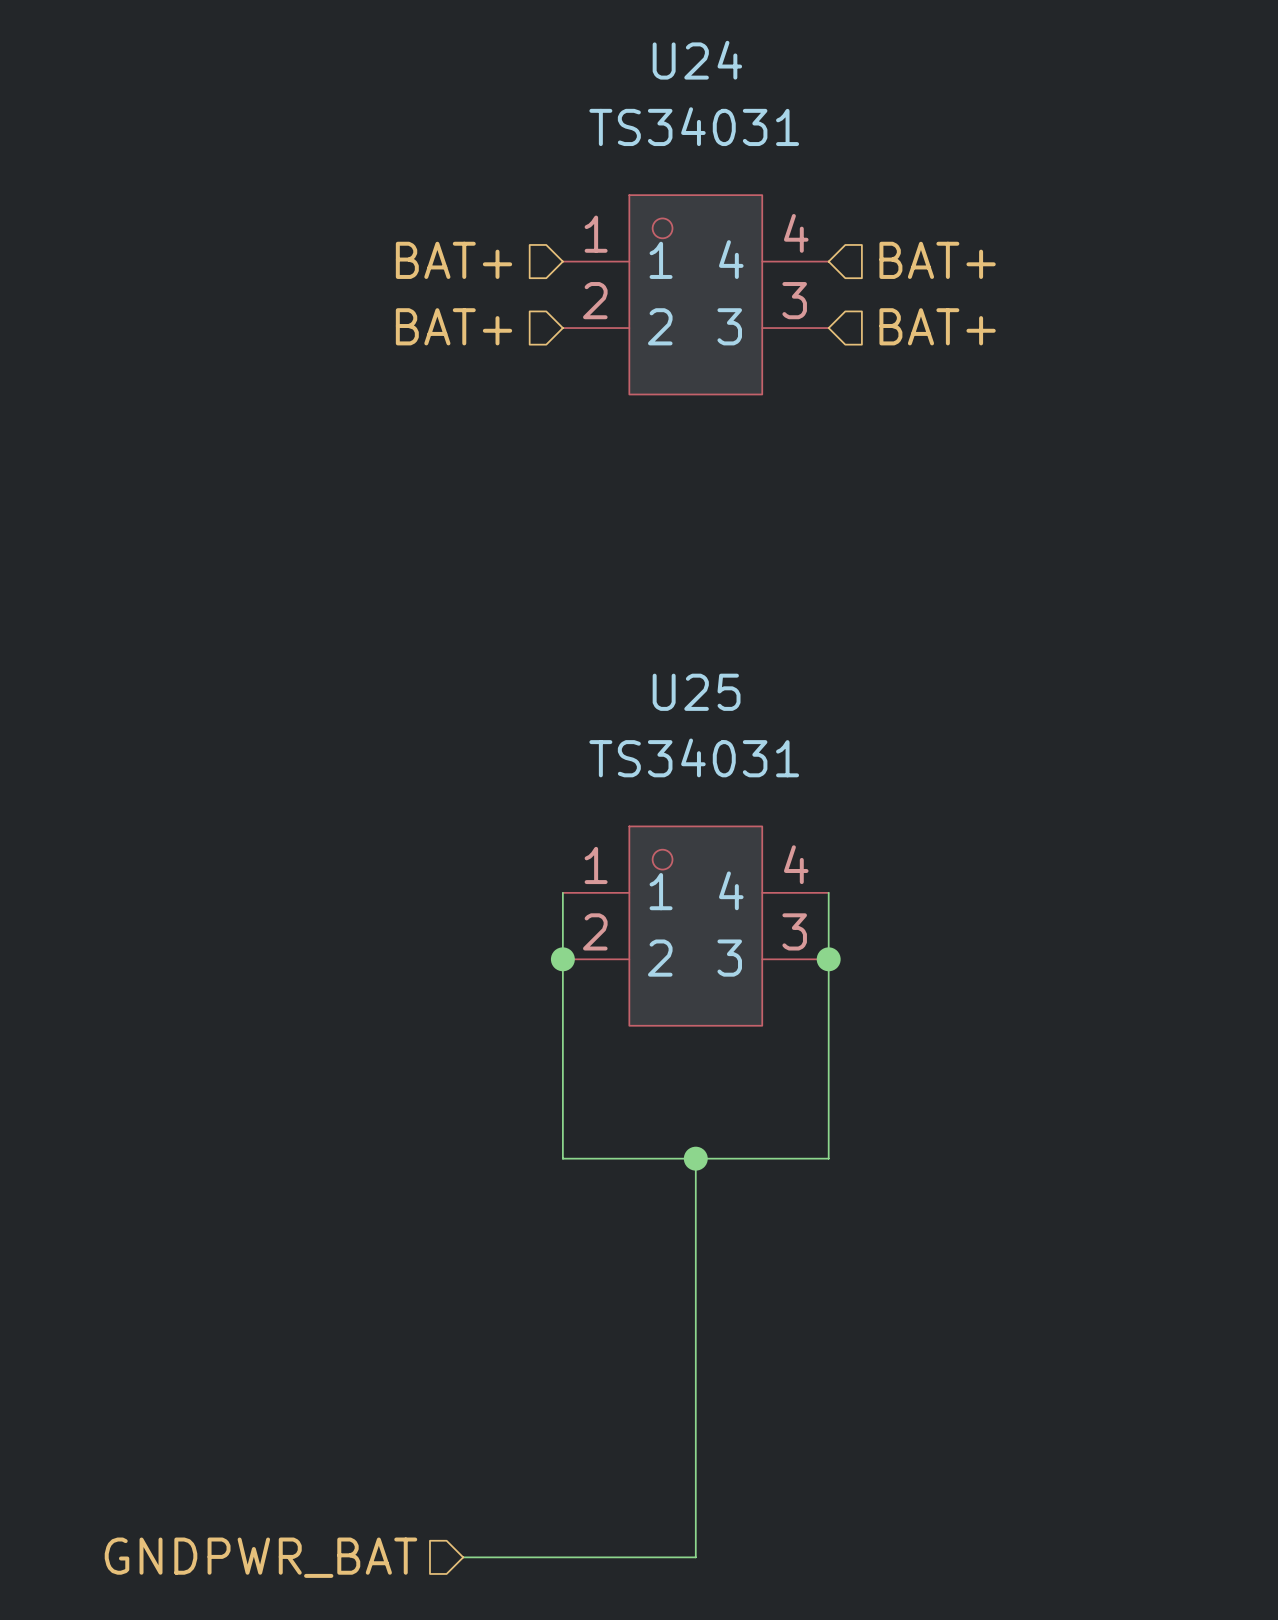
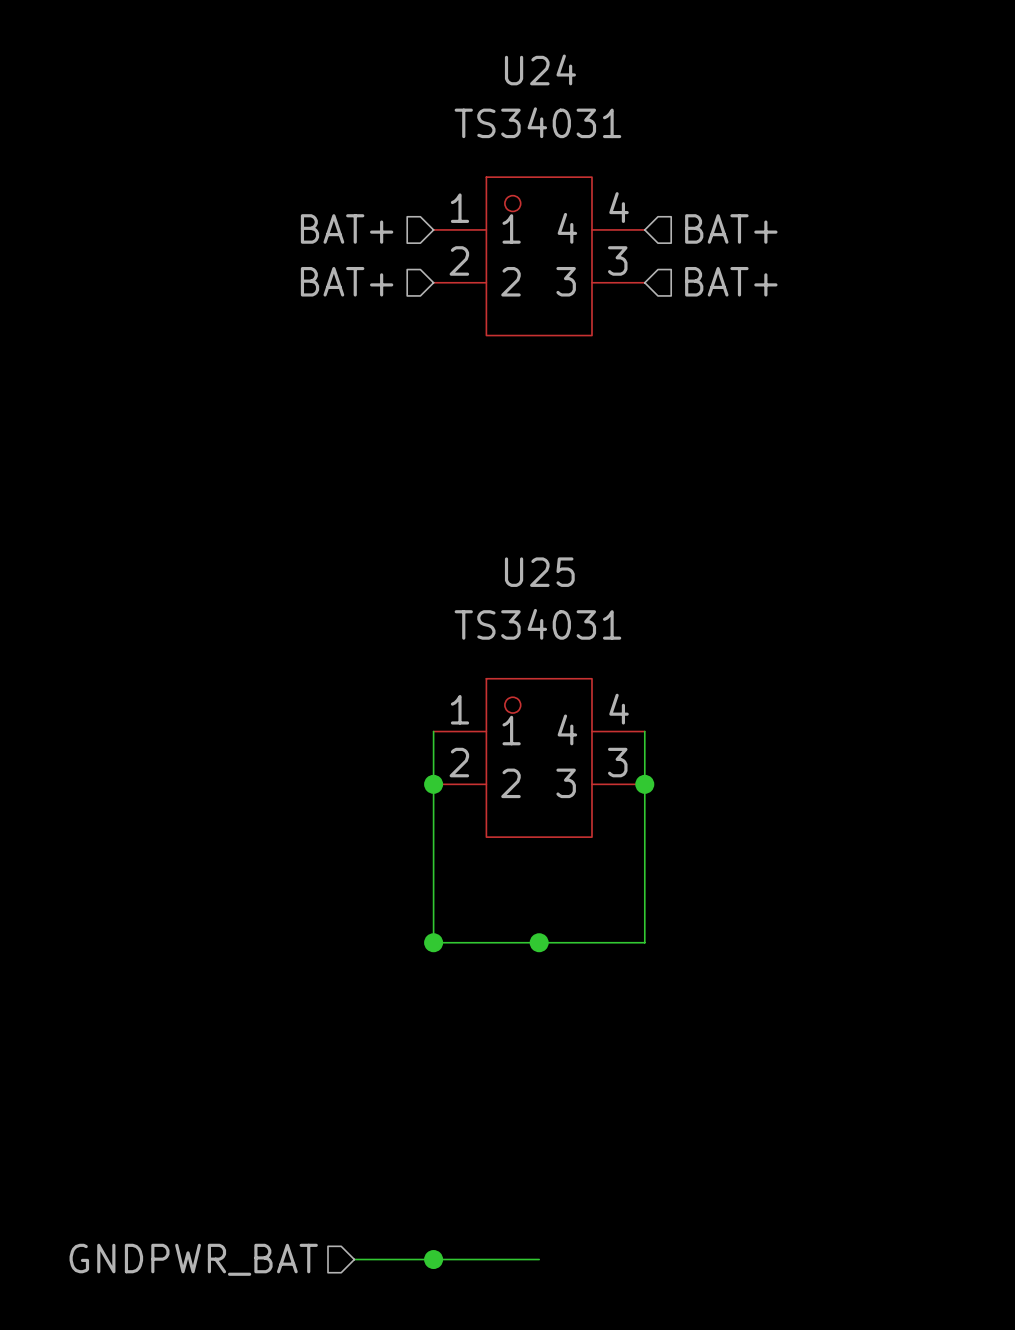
junction: none -> (433, 942)
wire: (695, 1158) (695, 1557) -> none
junction: none -> (433, 1259)

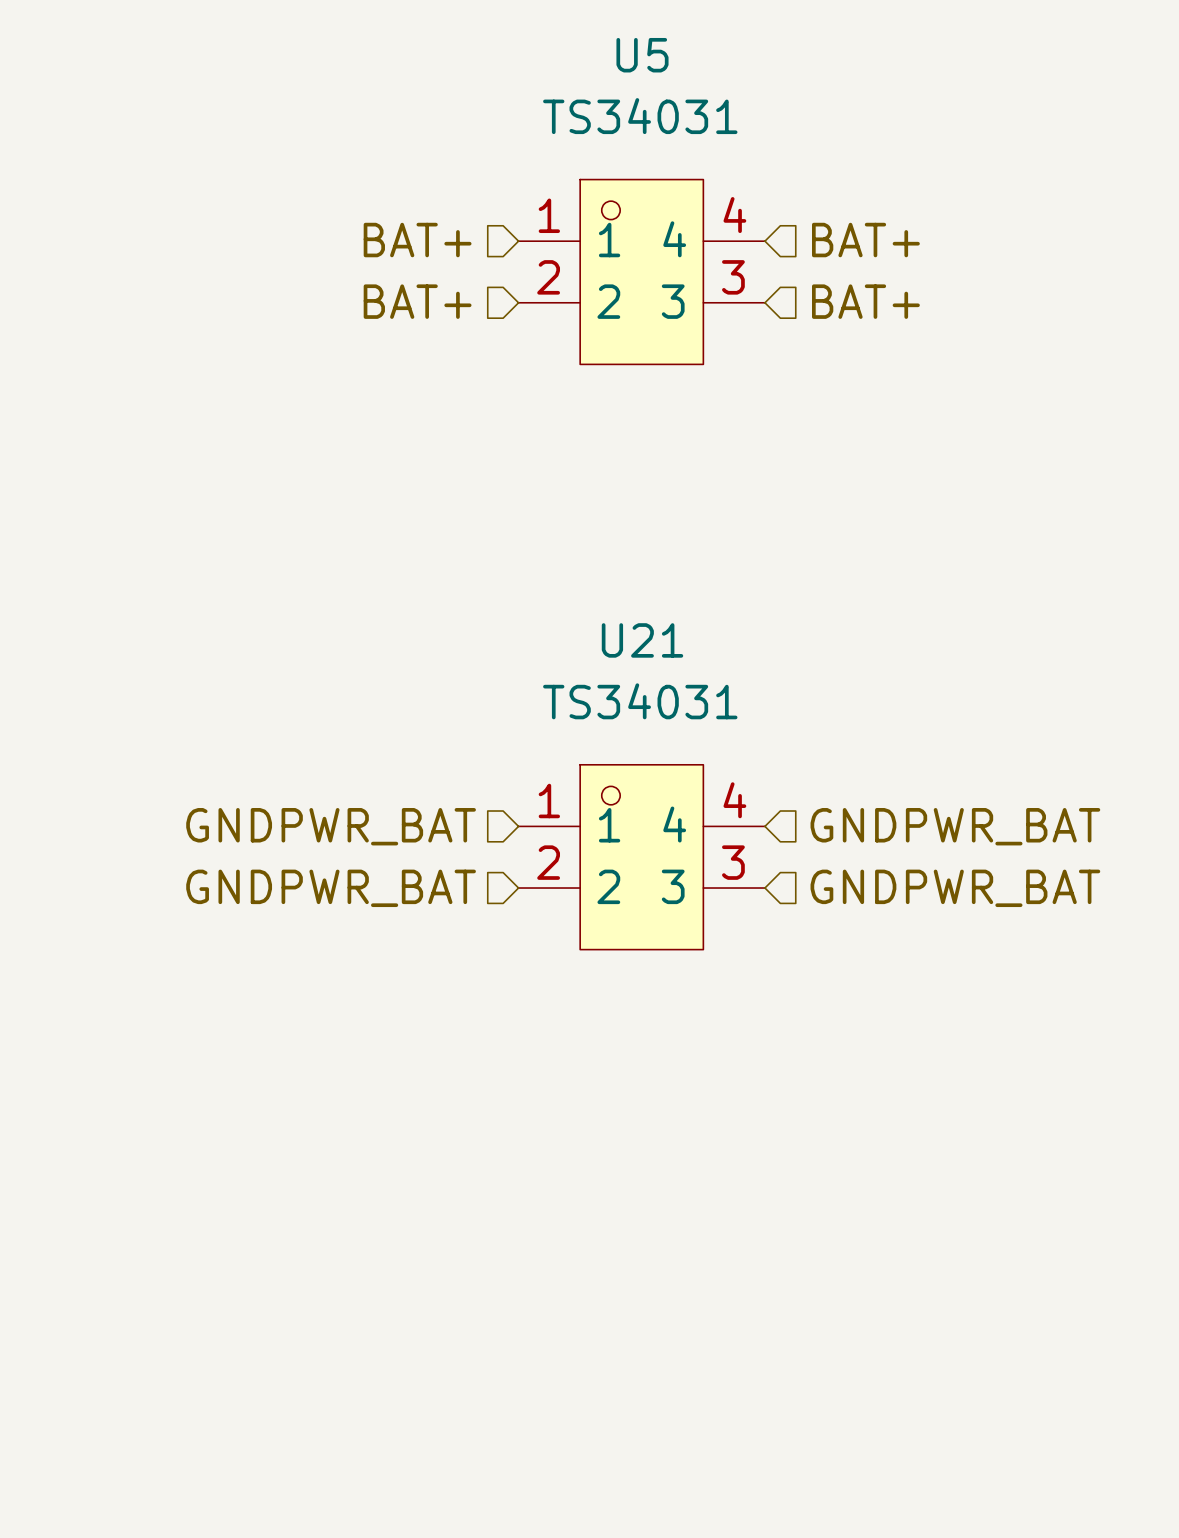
U24 name: U24 (540, 69) -> U5 (642, 55)
U25 name: U25 (539, 572) -> U21 (642, 640)
hierarchical label: none -> GNDPWR_BAT (331, 826)
wire: (433, 731) (433, 942) (644, 942) (644, 731) -> none
hierarchical label: none -> GNDPWR_BAT (955, 826)
hierarchical label: none -> GNDPWR_BAT (331, 888)
junction: (433, 784) -> none
junction: (644, 784) -> none
hierarchical label: none -> GNDPWR_BAT (955, 888)
junction: (433, 942) -> none
junction: (539, 942) -> none
hierarchical label: GNDPWR_BAT (193, 1259) -> none
wire: (354, 1259) (539, 1259) -> none
junction: (433, 1259) -> none

